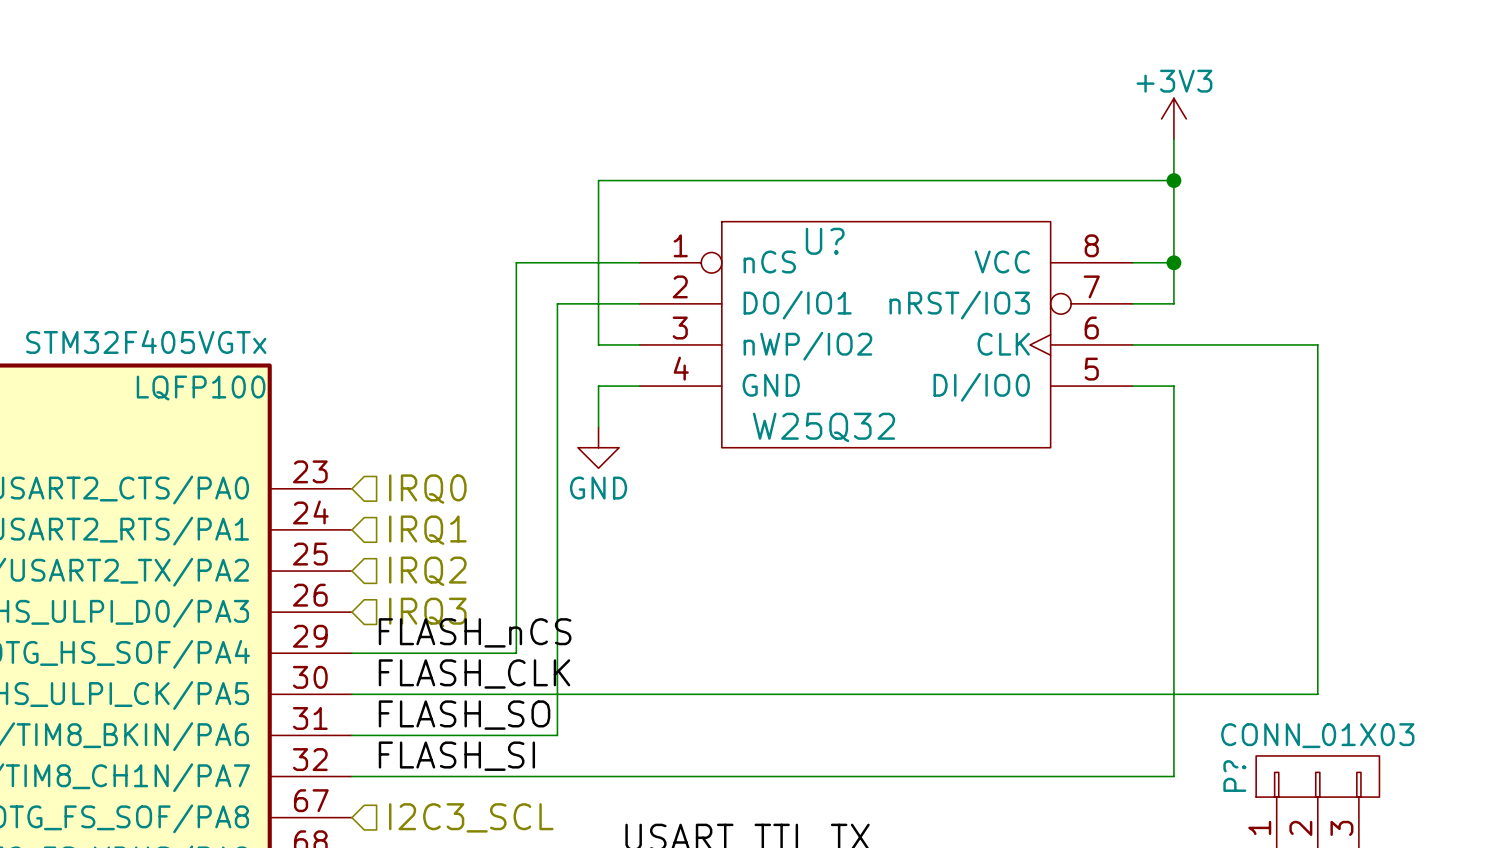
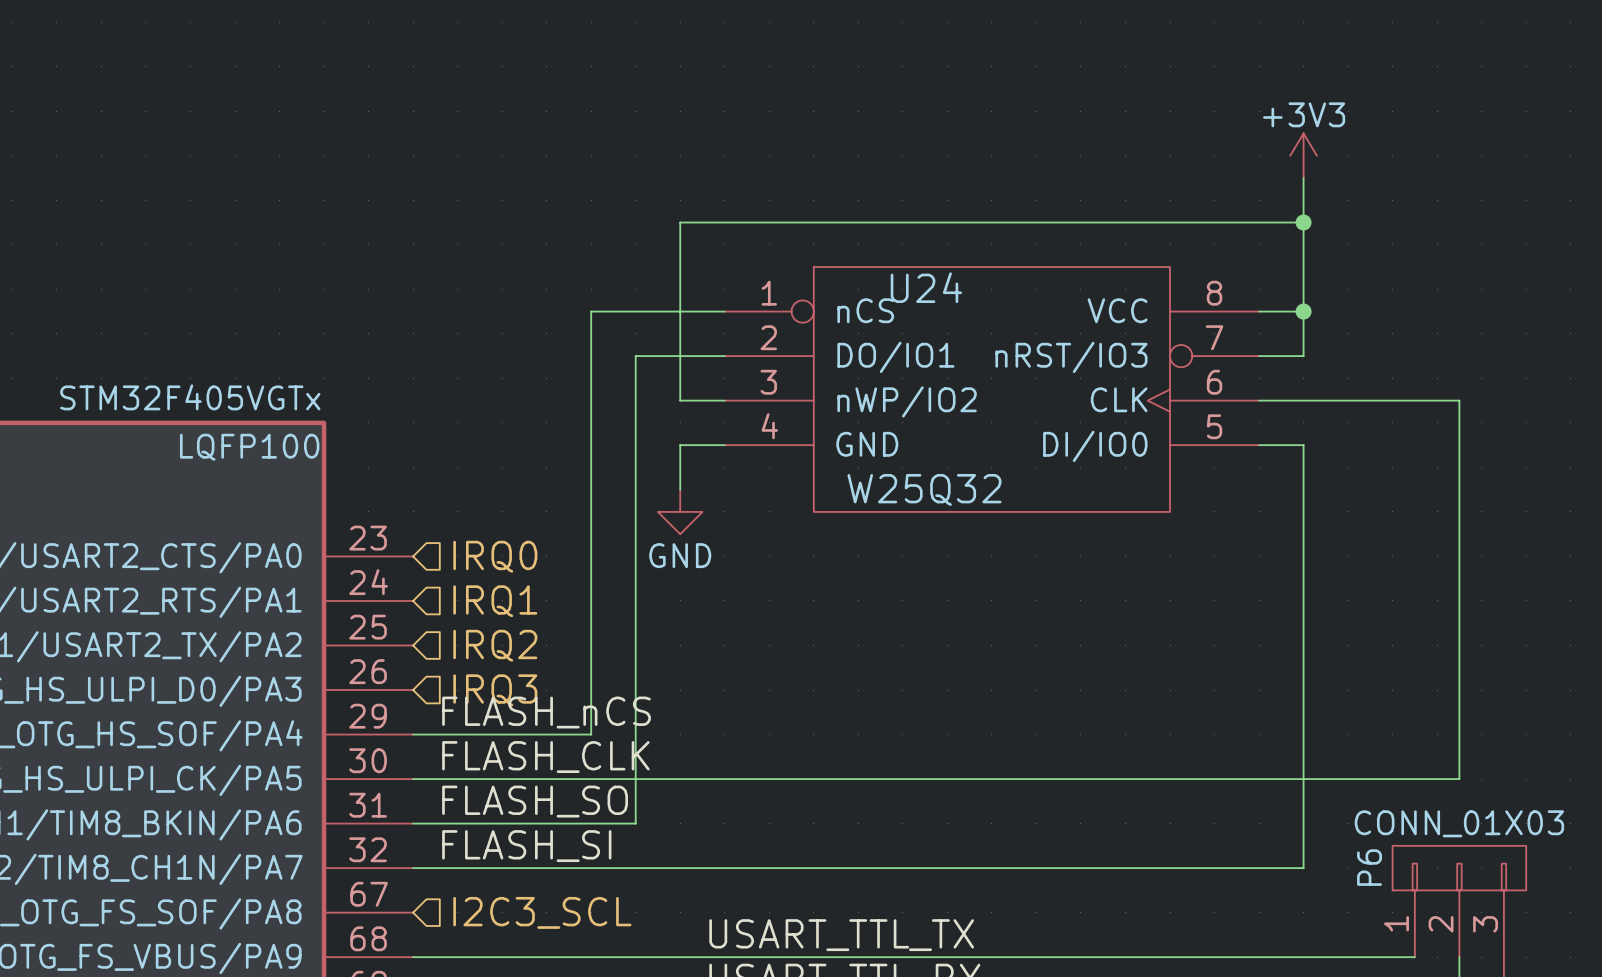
U? name: U? (825, 241) -> U24 (926, 287)
P? name: P? (1234, 776) -> P6 (1369, 867)

